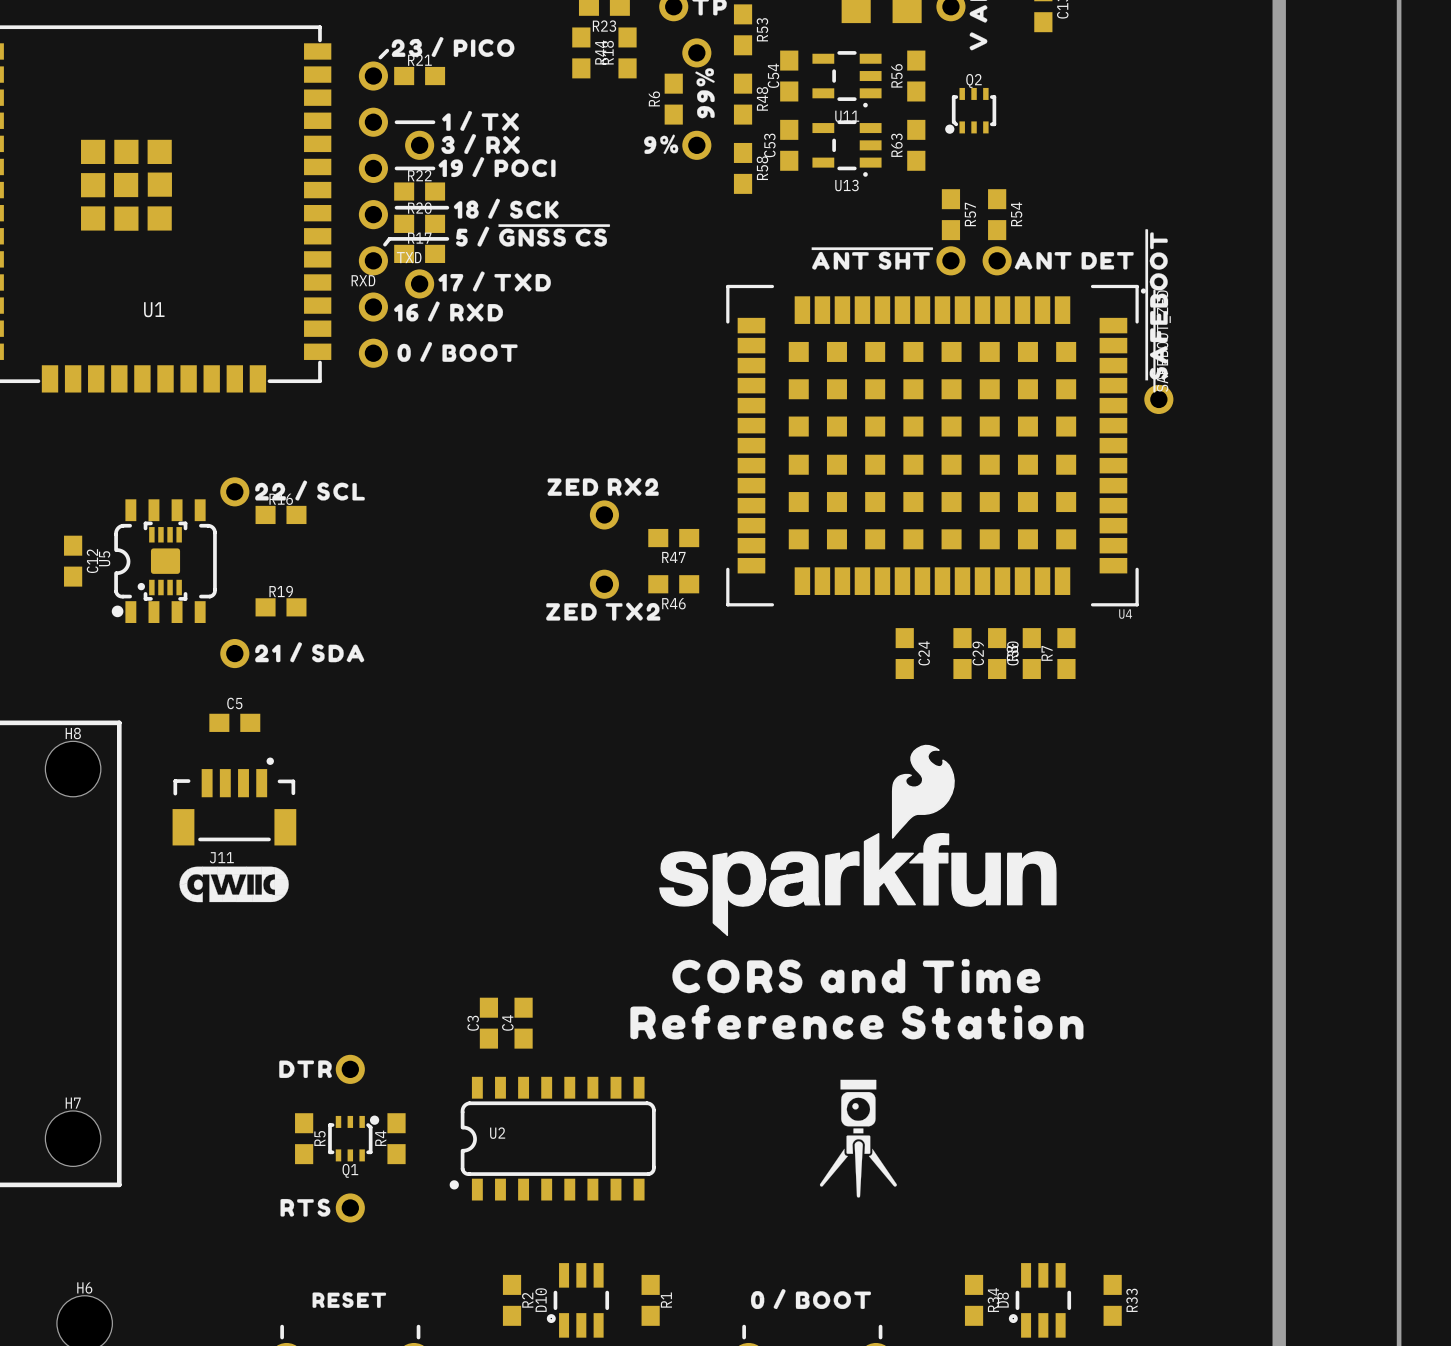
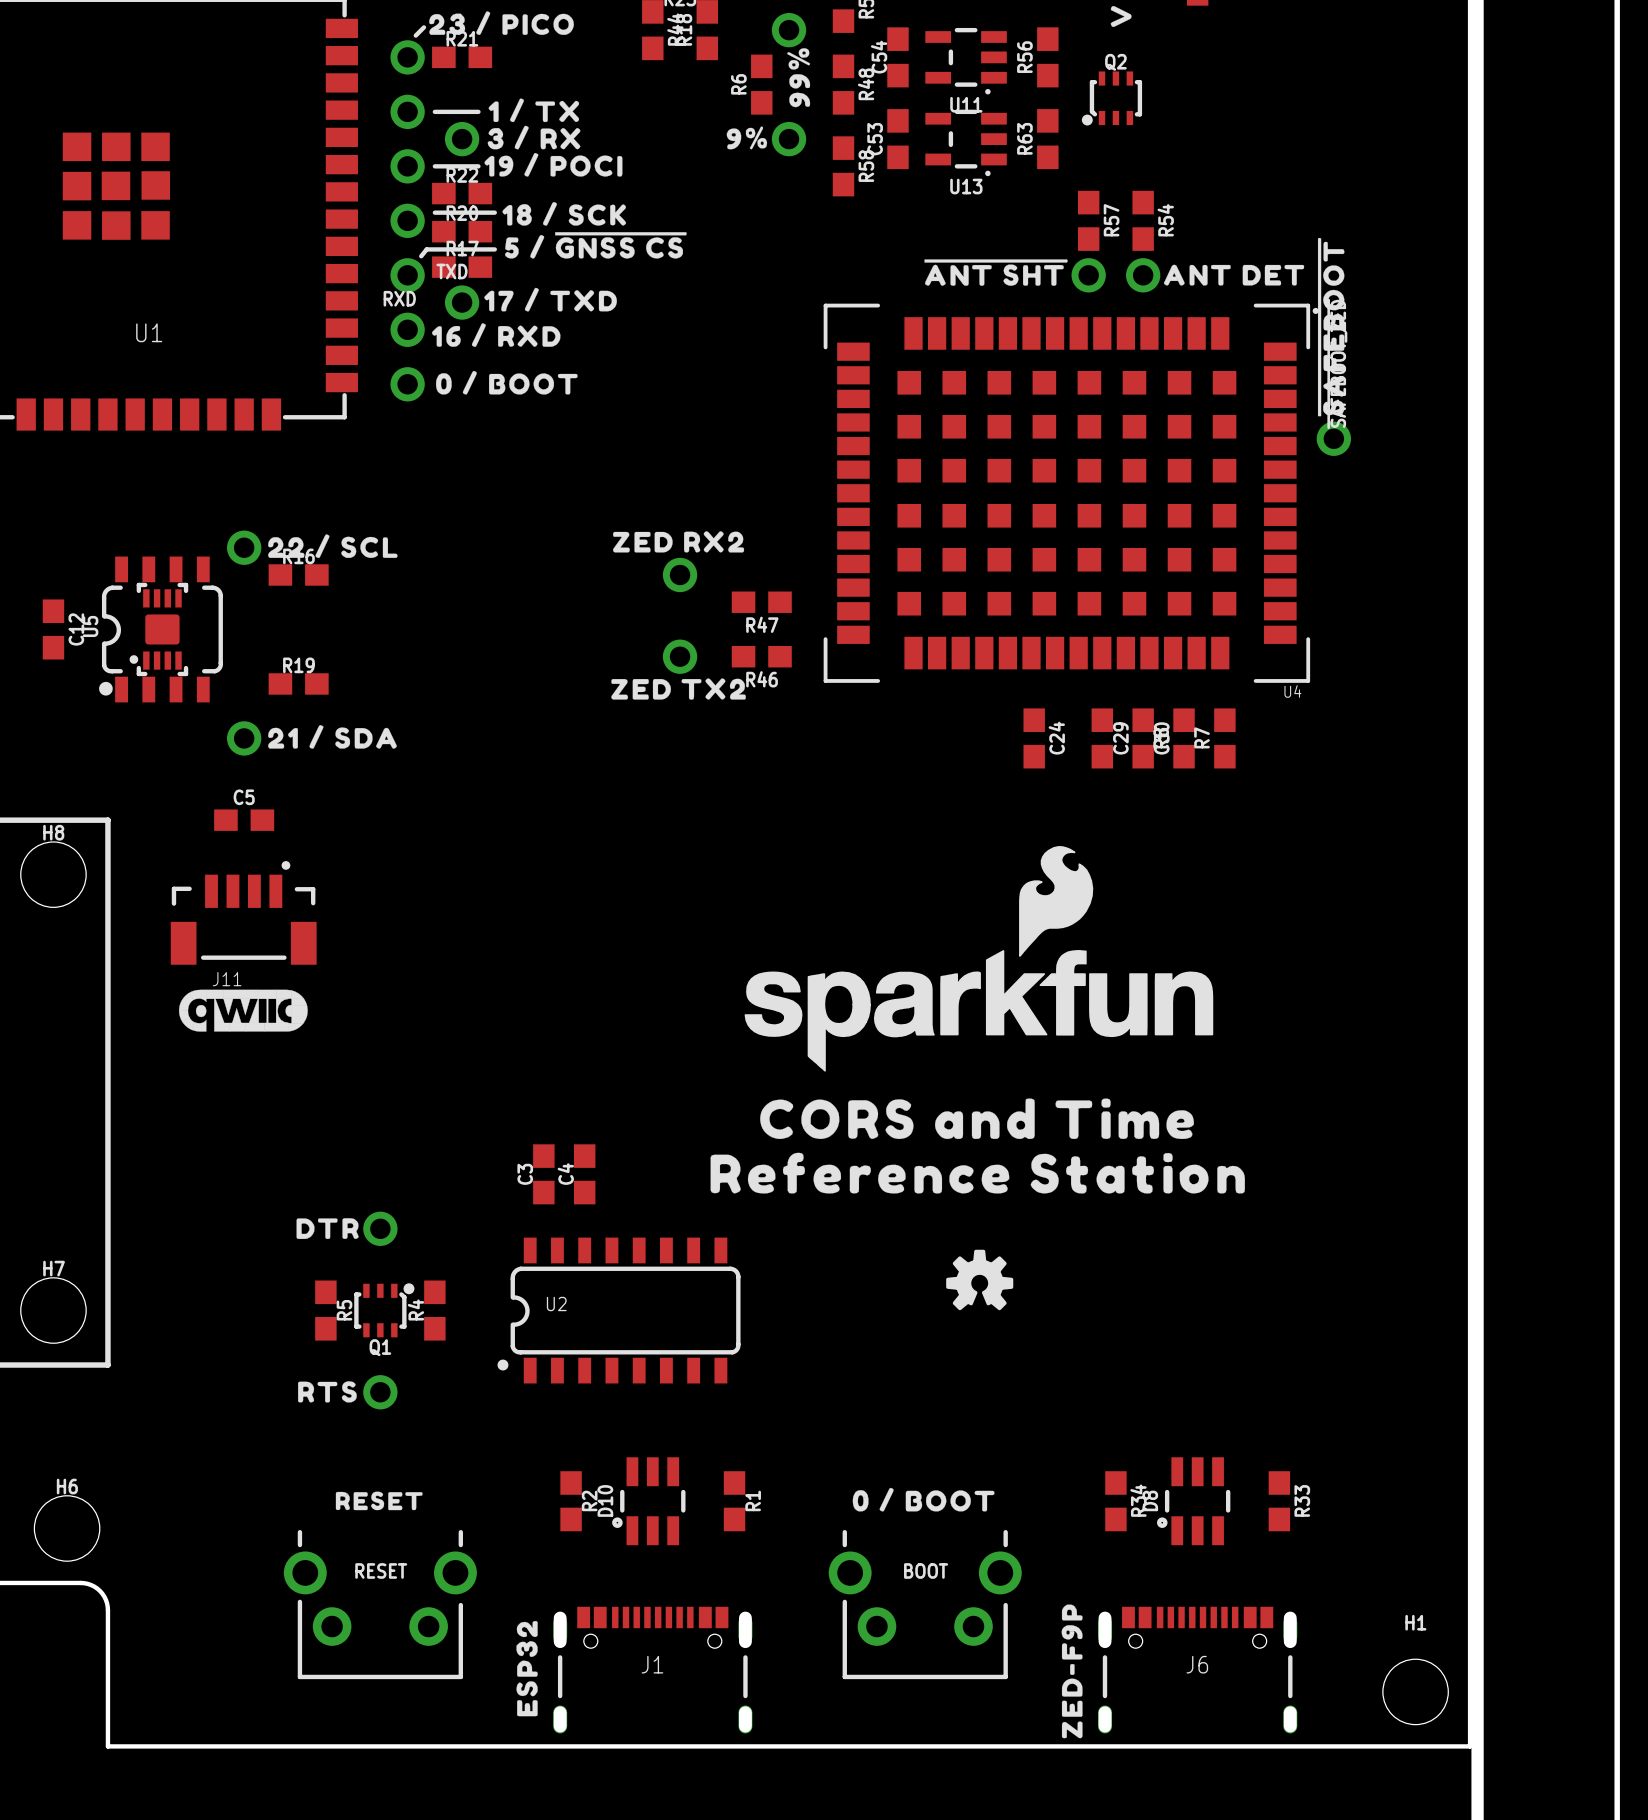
drawing: [819, 1079, 897, 1198] -> none
drawing: none -> [946, 1249, 1014, 1311]

